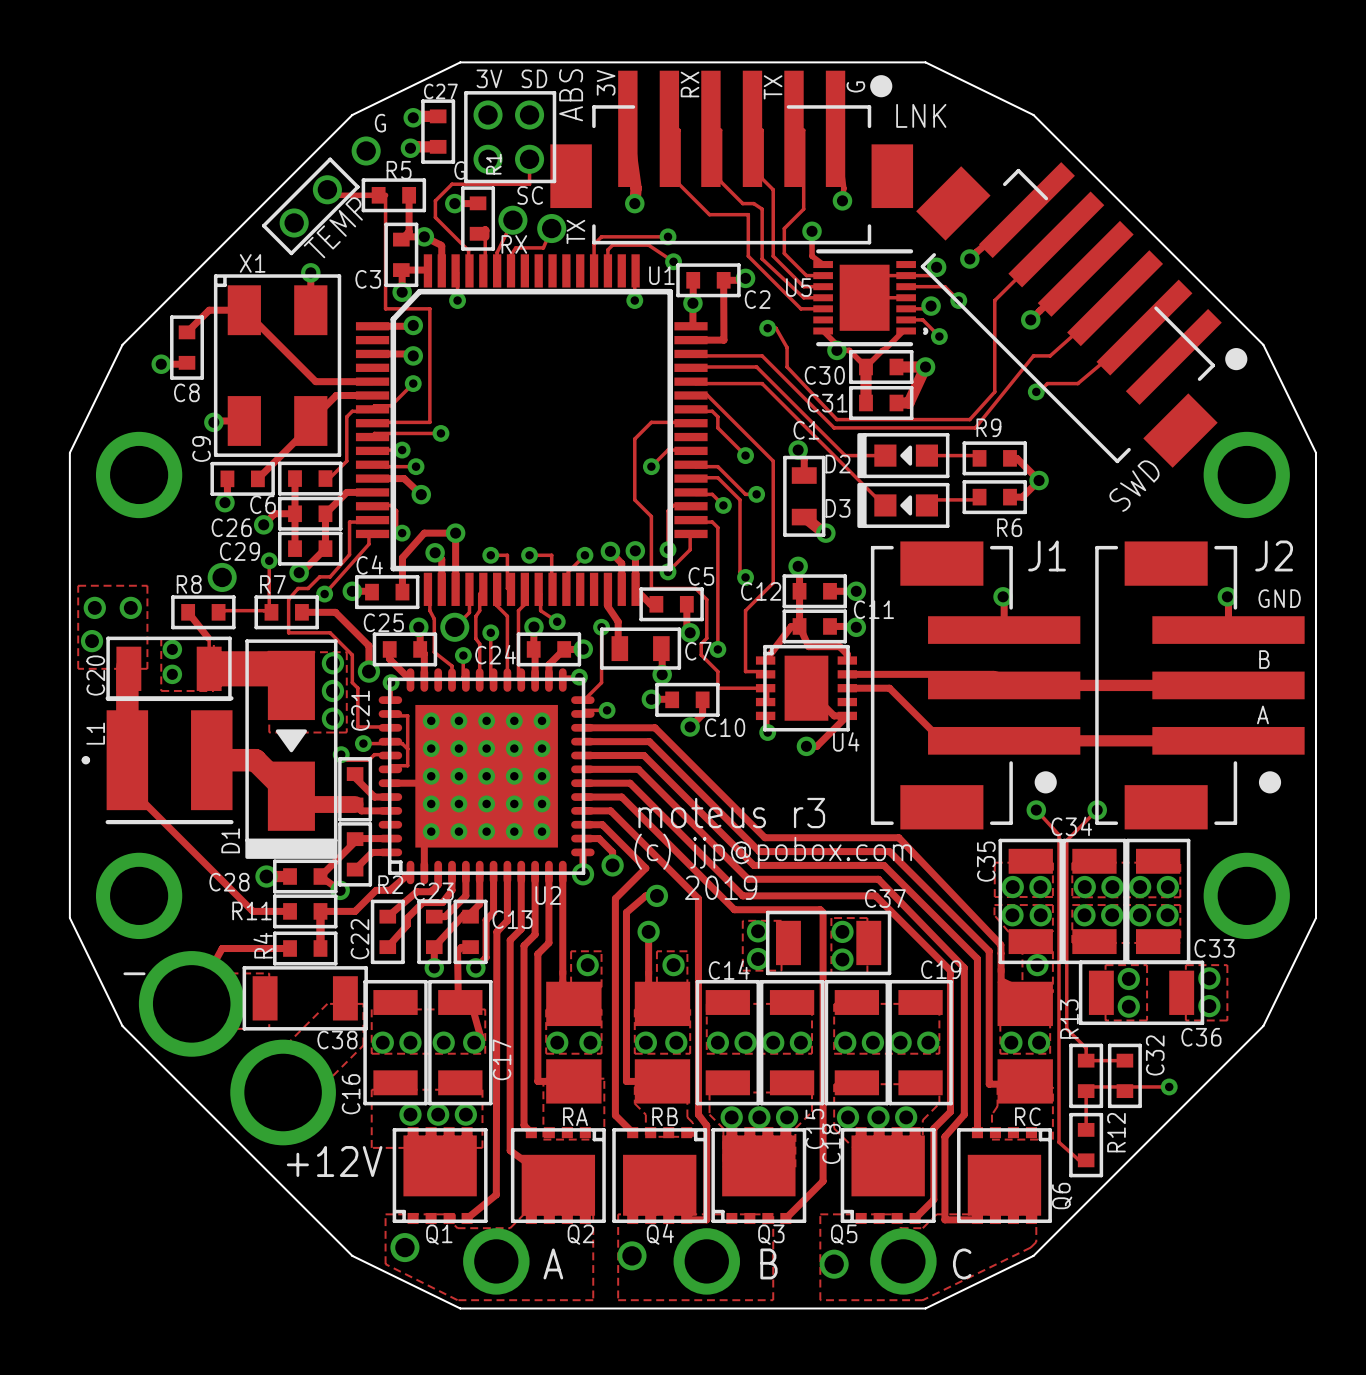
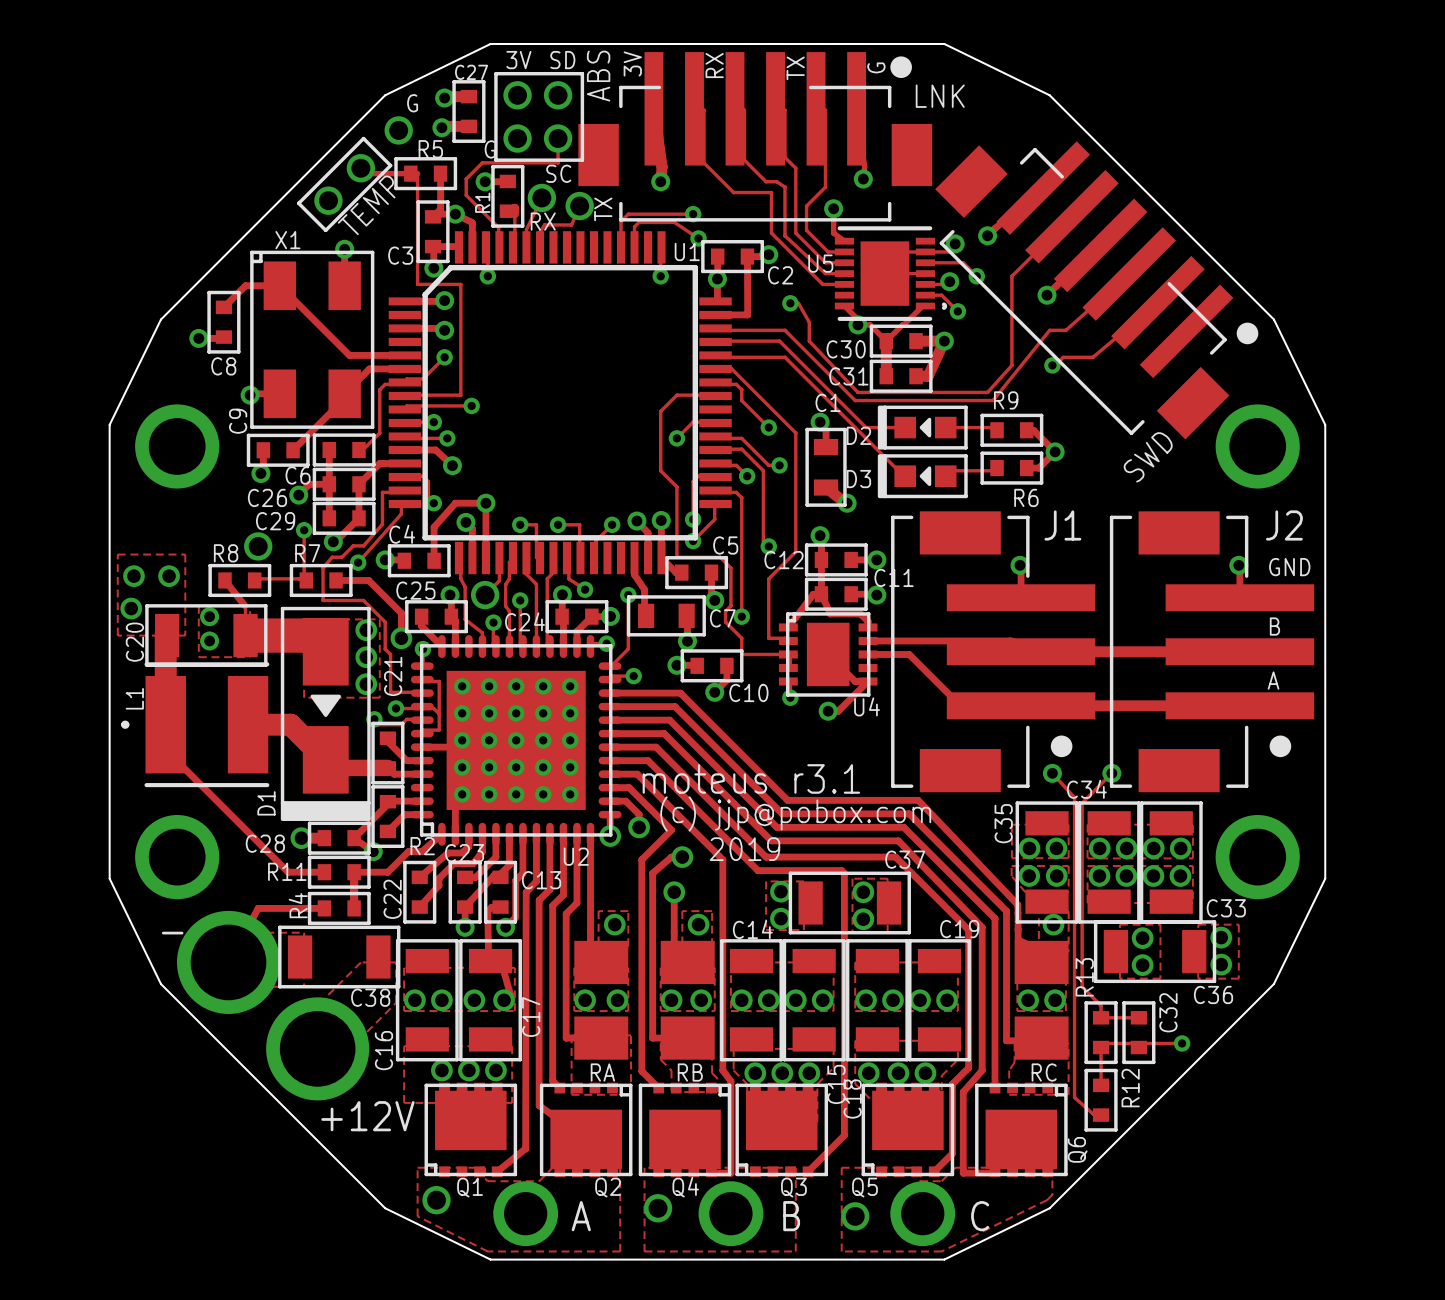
R1 name position: R1 (493, 164) -> R1 (482, 202)
text: moteus r3 (731, 813) -> moteus r3.1 (751, 778)

